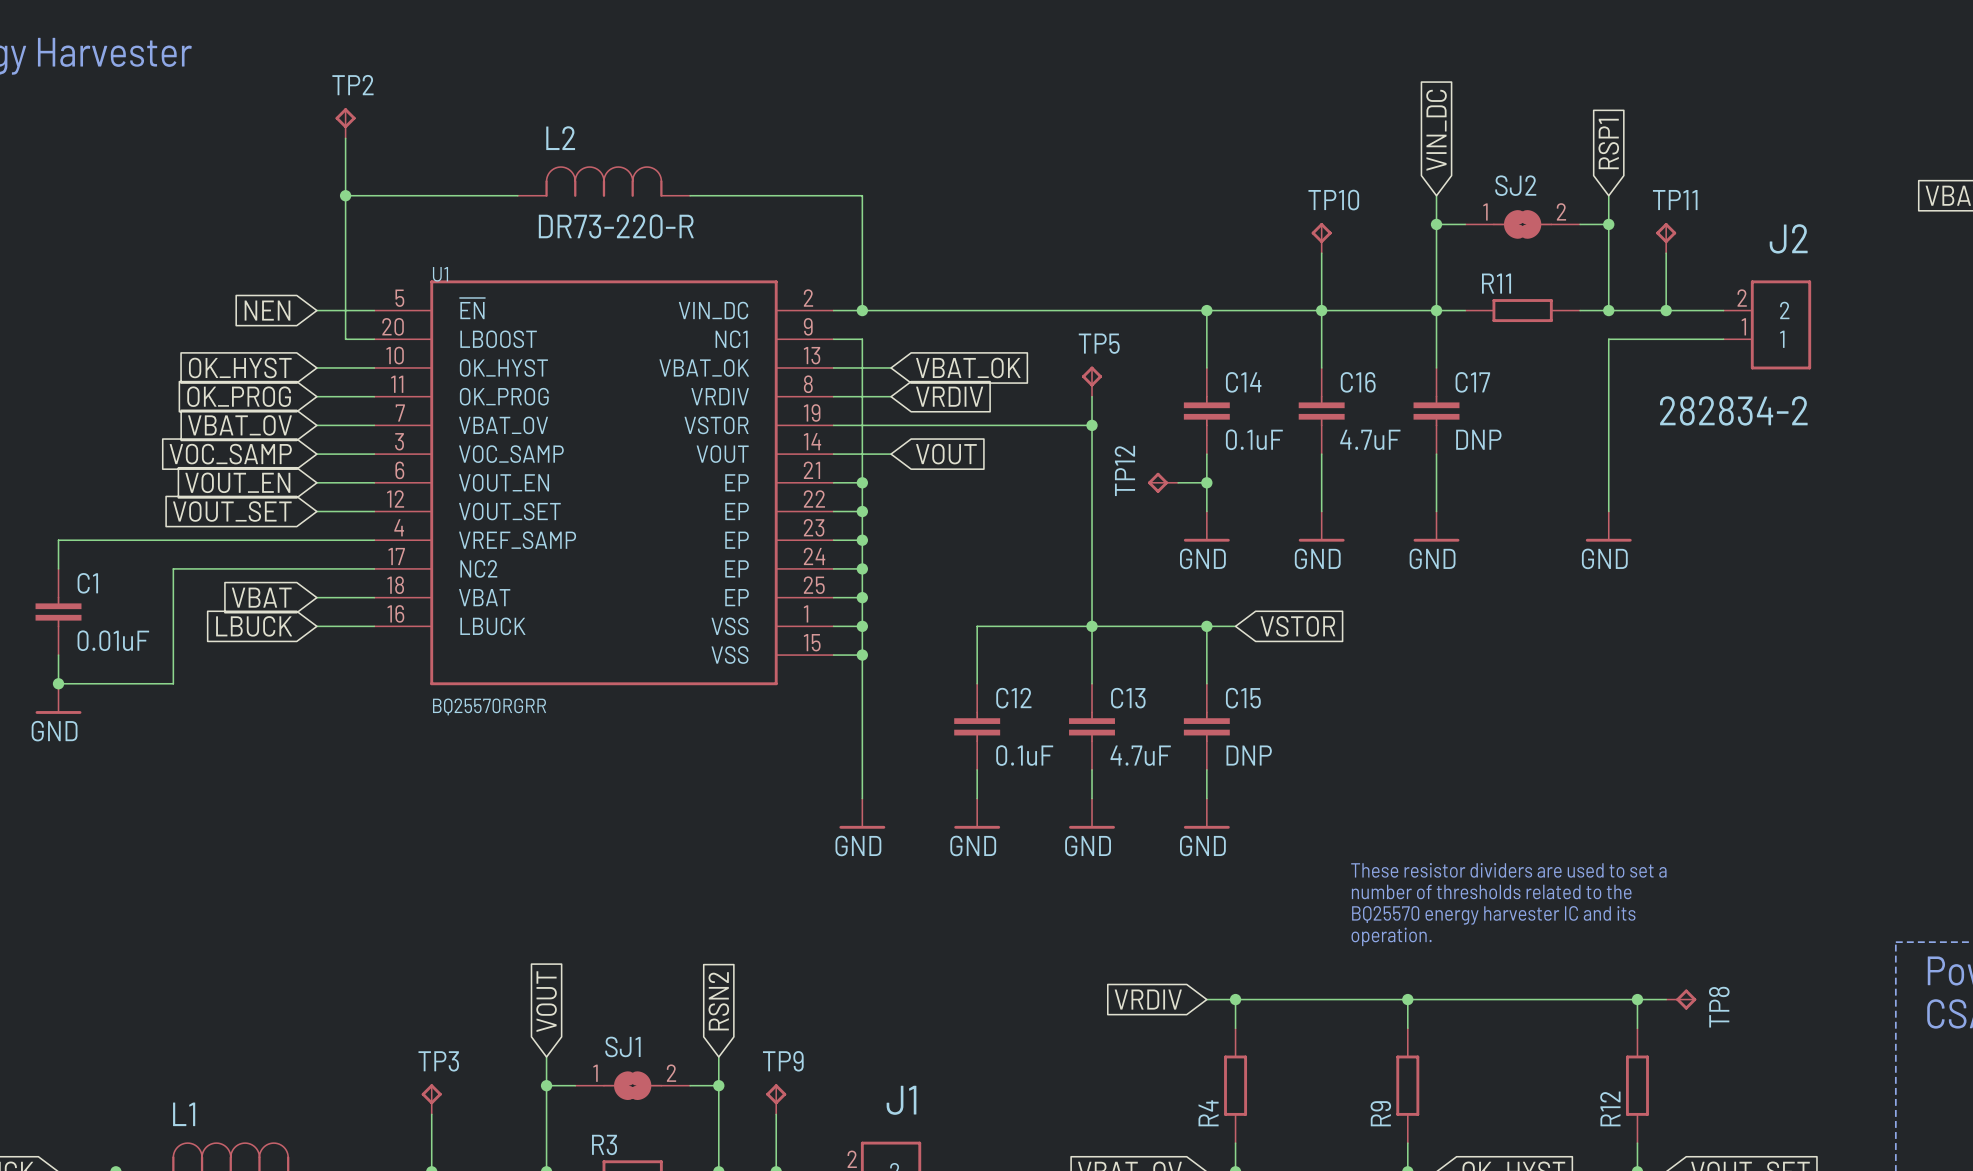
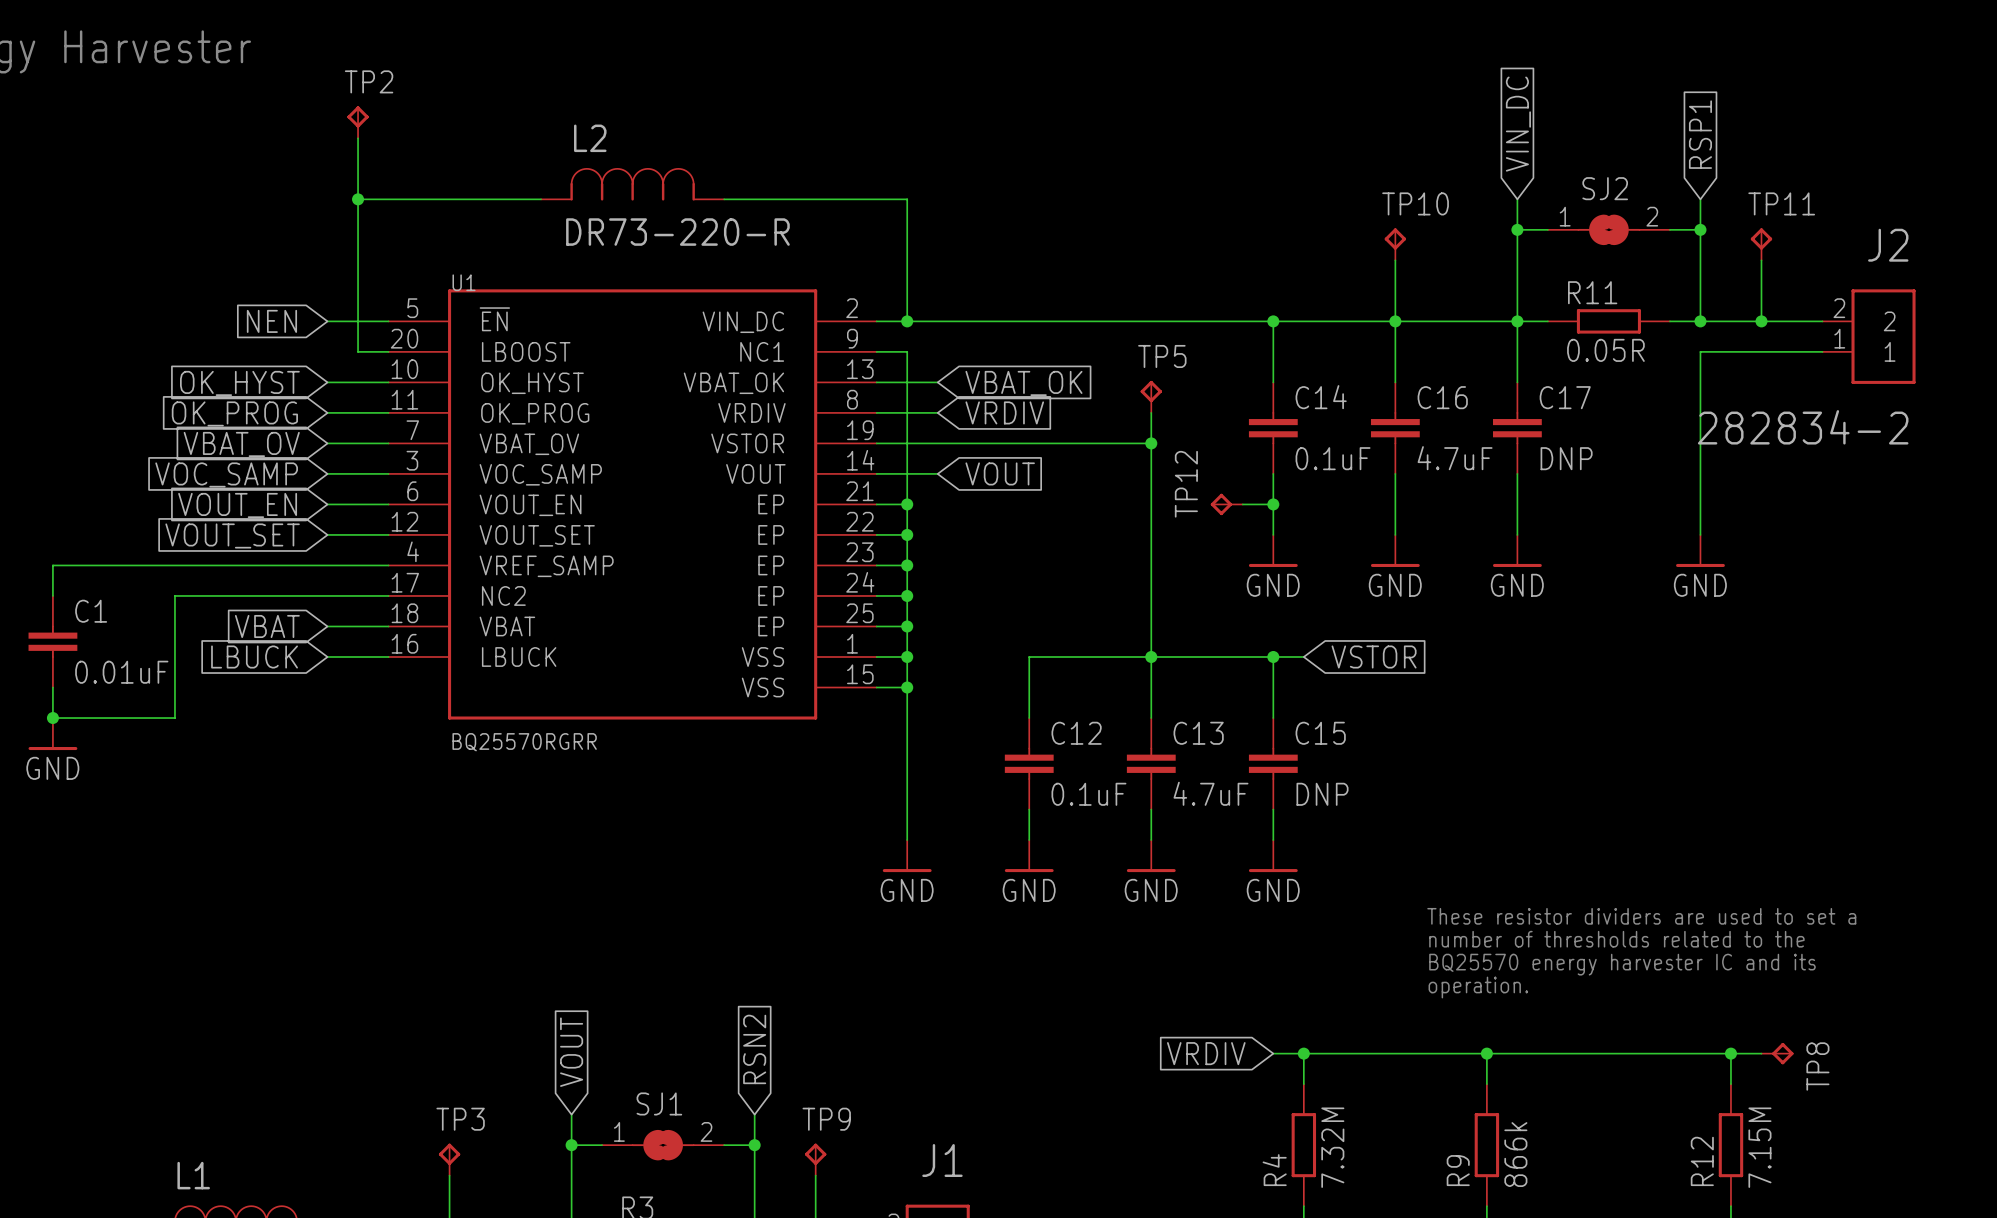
R11 value: none -> 0.05R (1605, 350)
R4 value: none -> 7.32M (1332, 1147)
R12 value: none -> 7.15M (1759, 1147)
R9 value: none -> 866k (1515, 1154)

